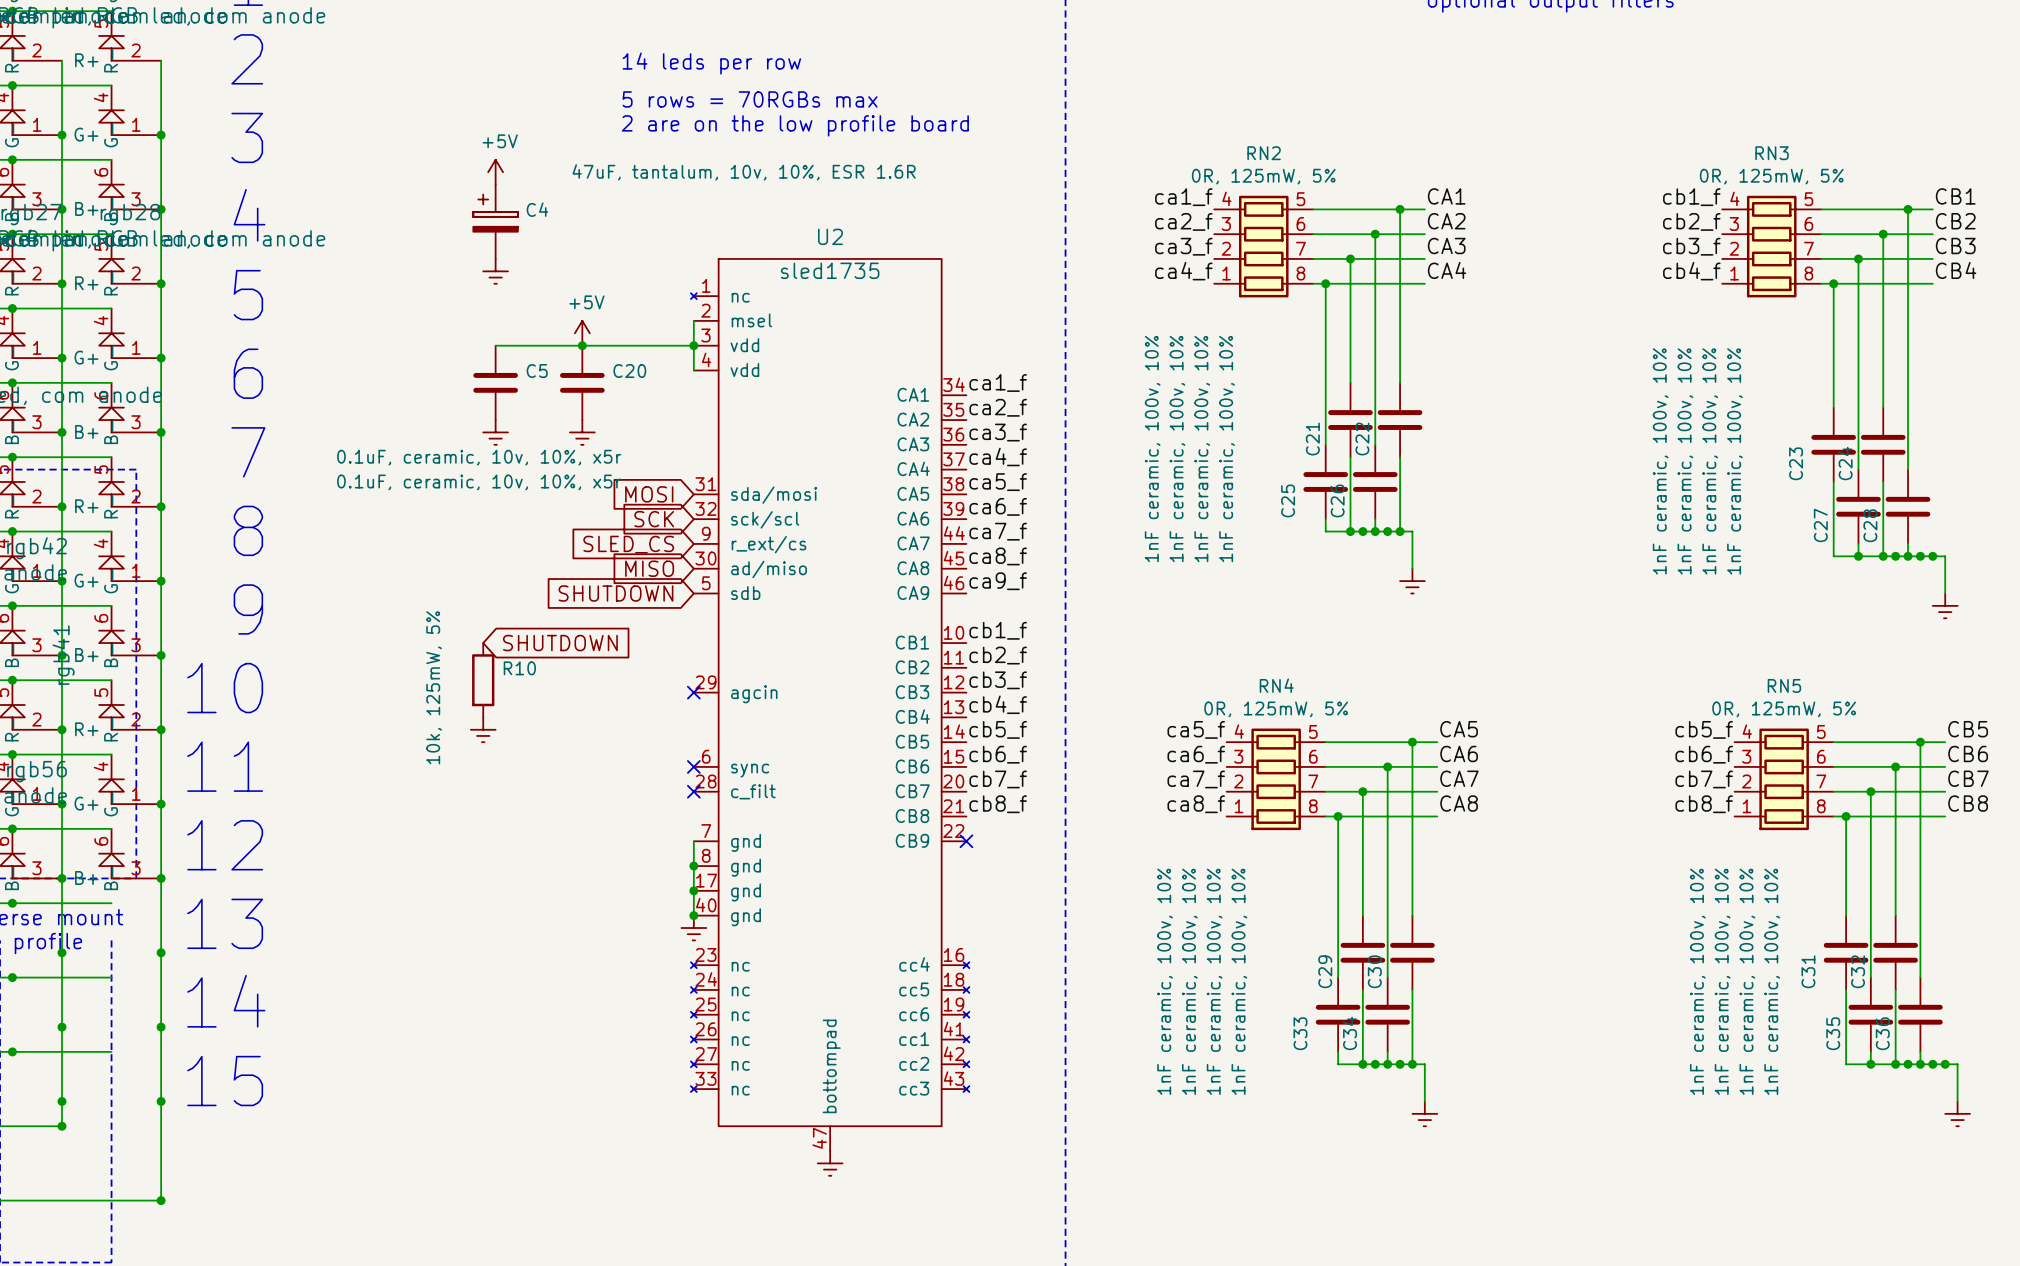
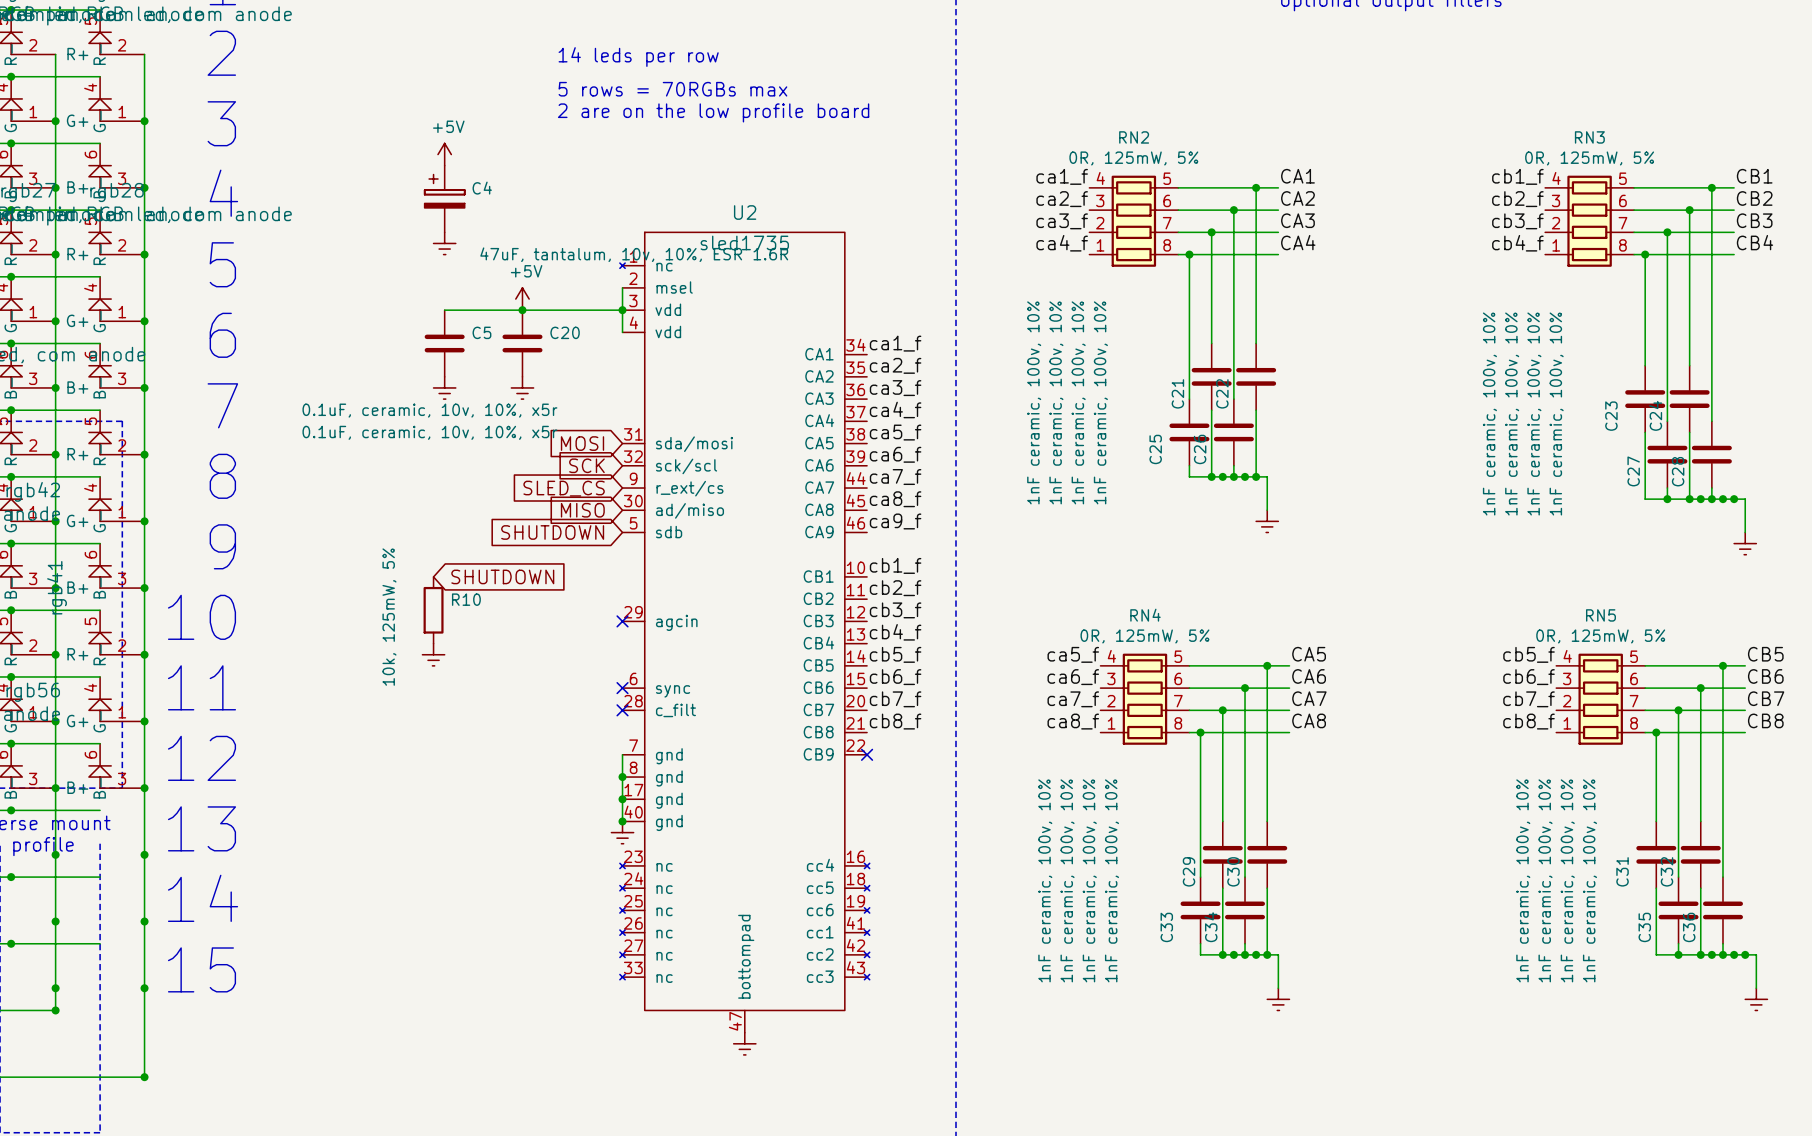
C4 value position: 47uF, tantalum, 10v, 10%, ESR 1.6R (744, 172) -> 47uF, tantalum, 10v, 10%, ESR 1.6R (634, 254)

